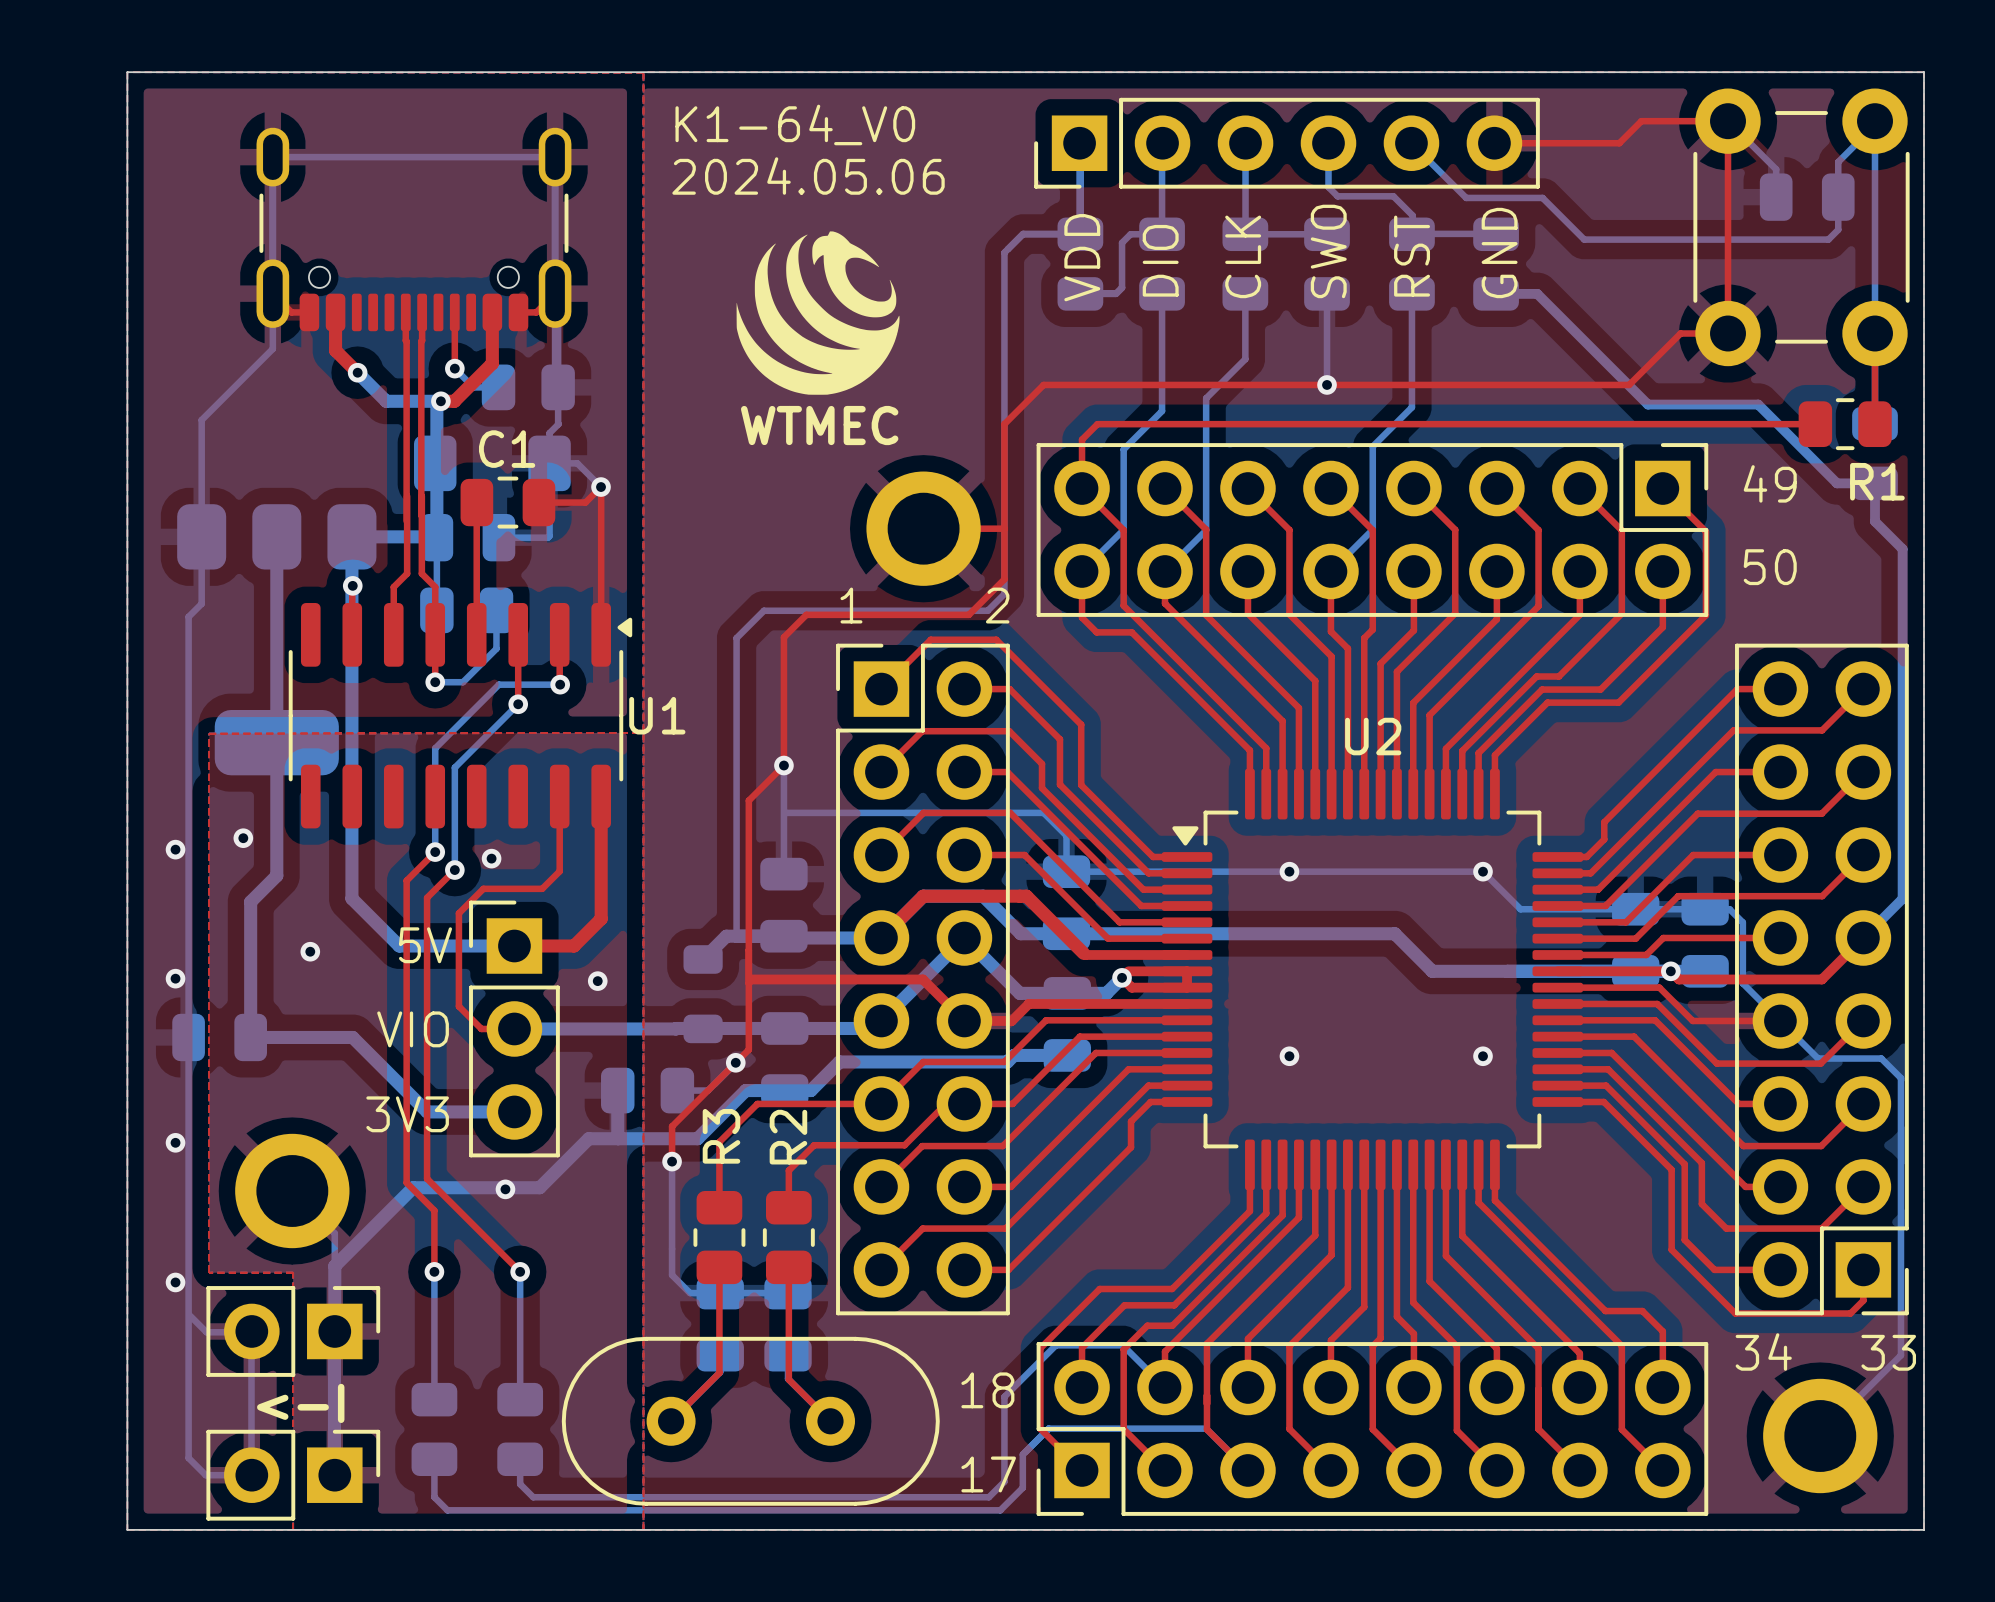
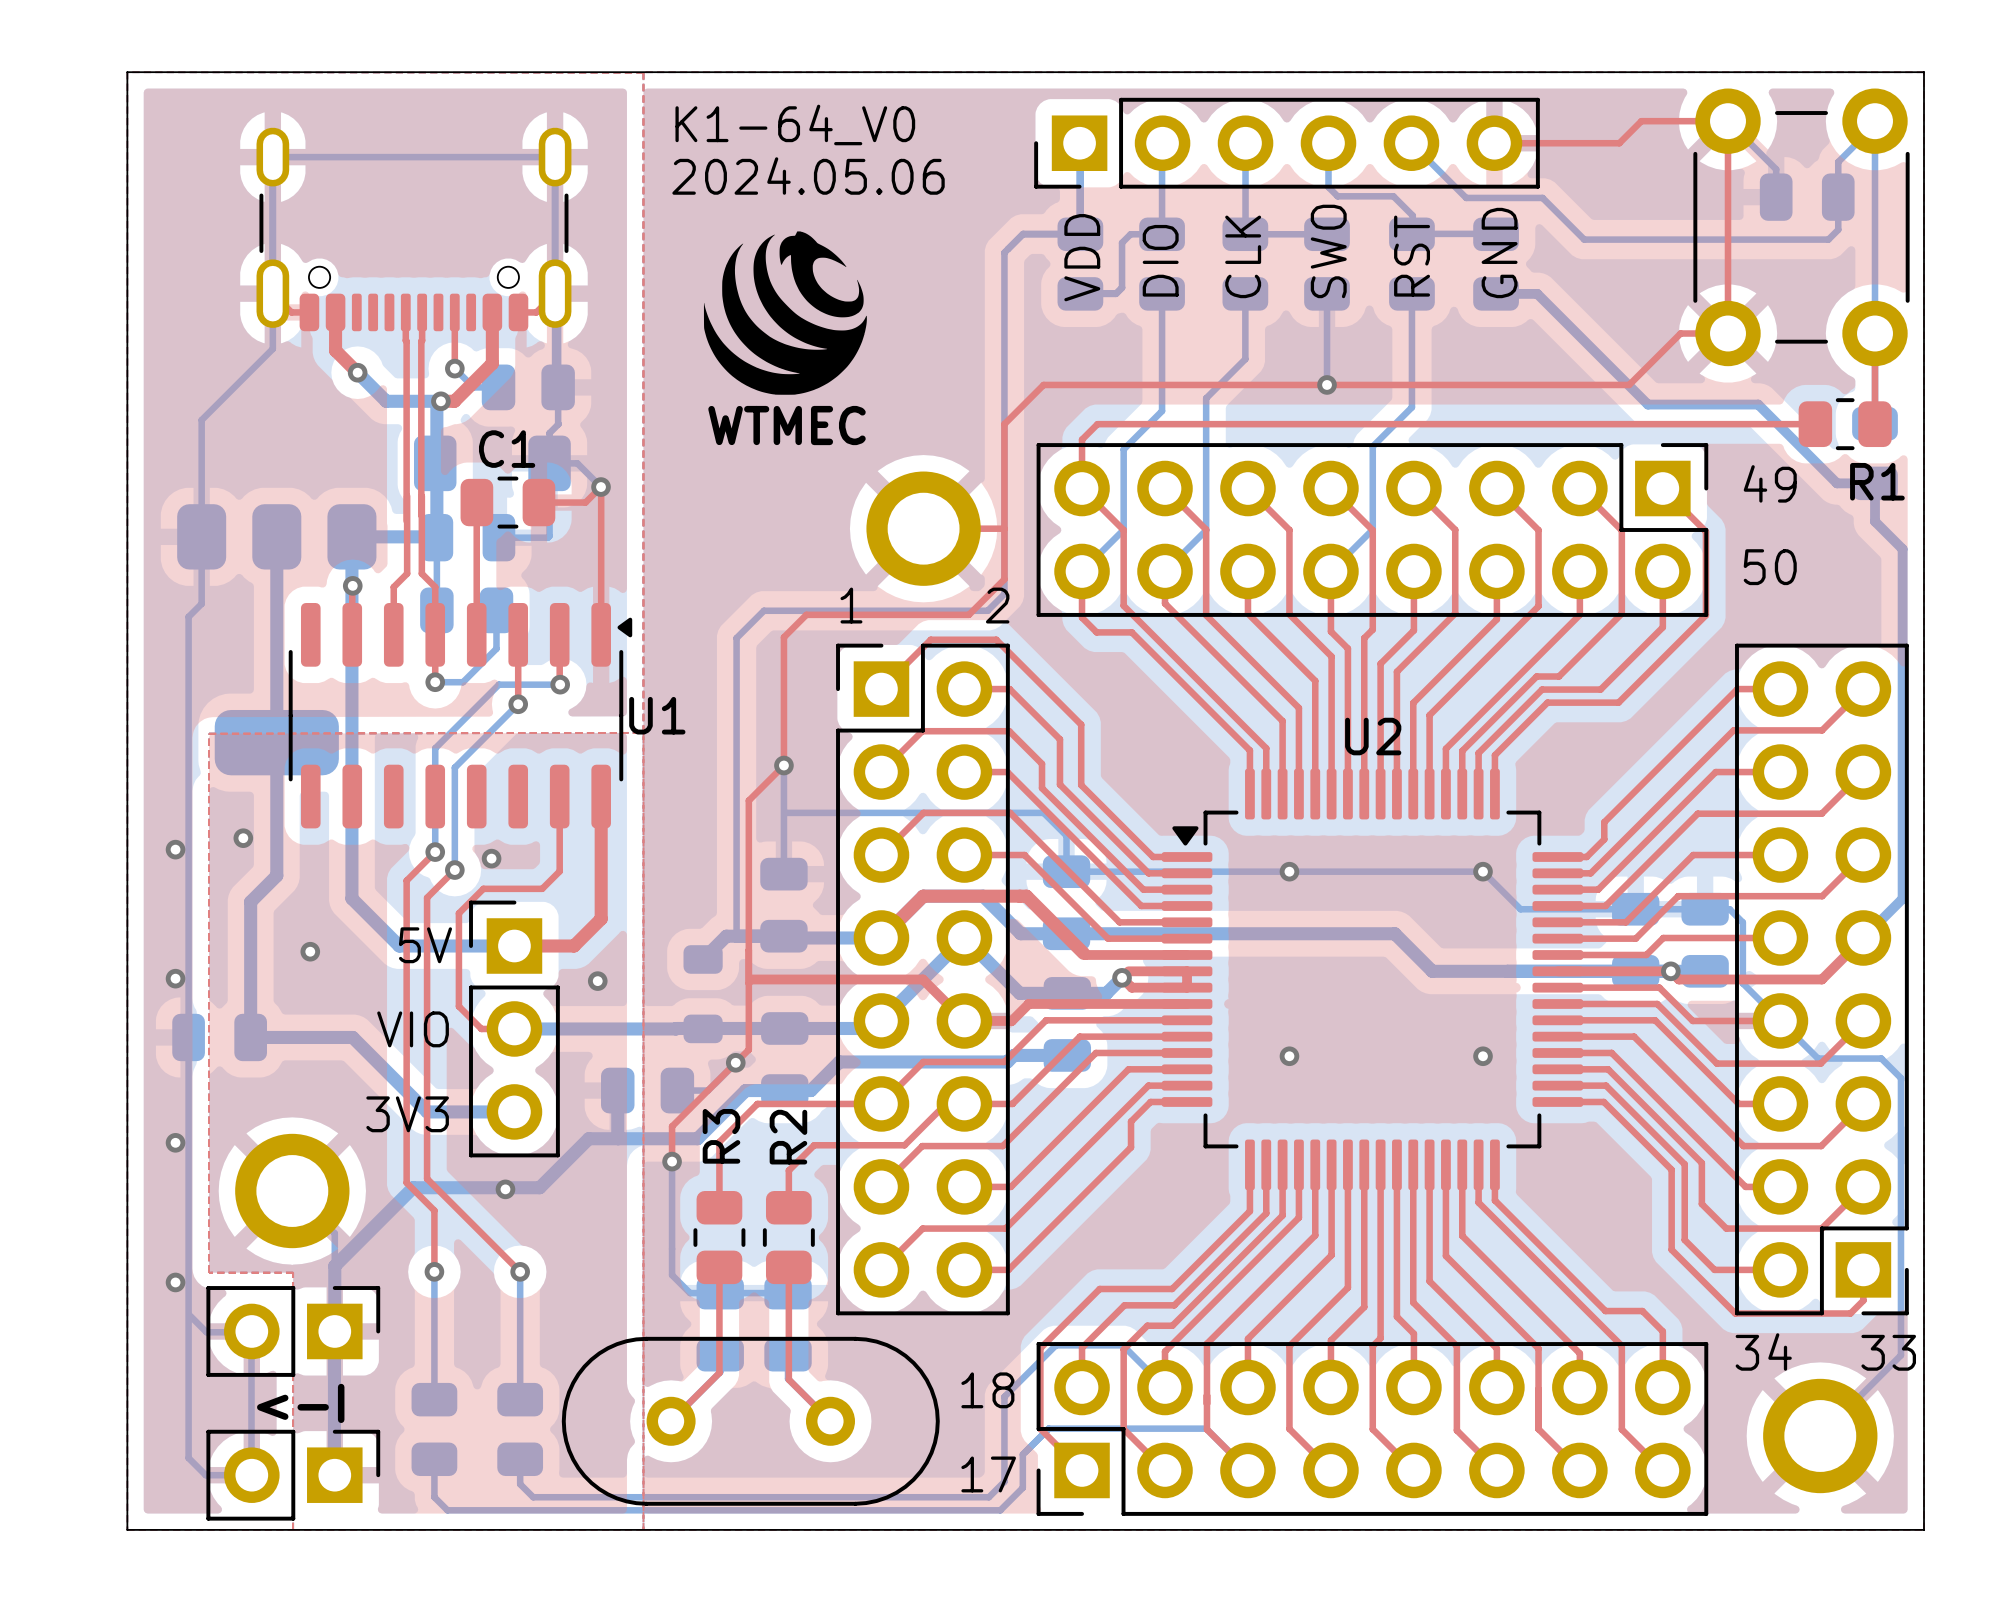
drawing position: (818, 313) -> (785, 313)

